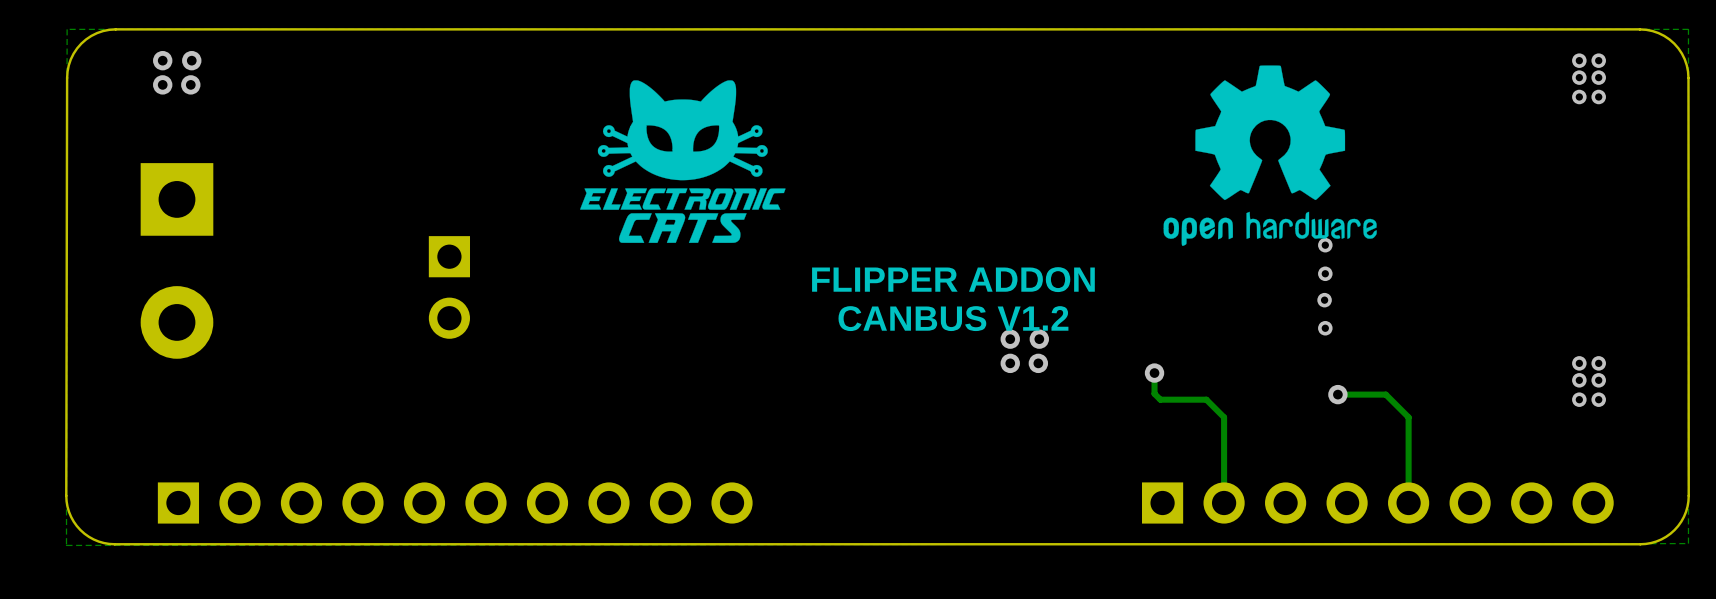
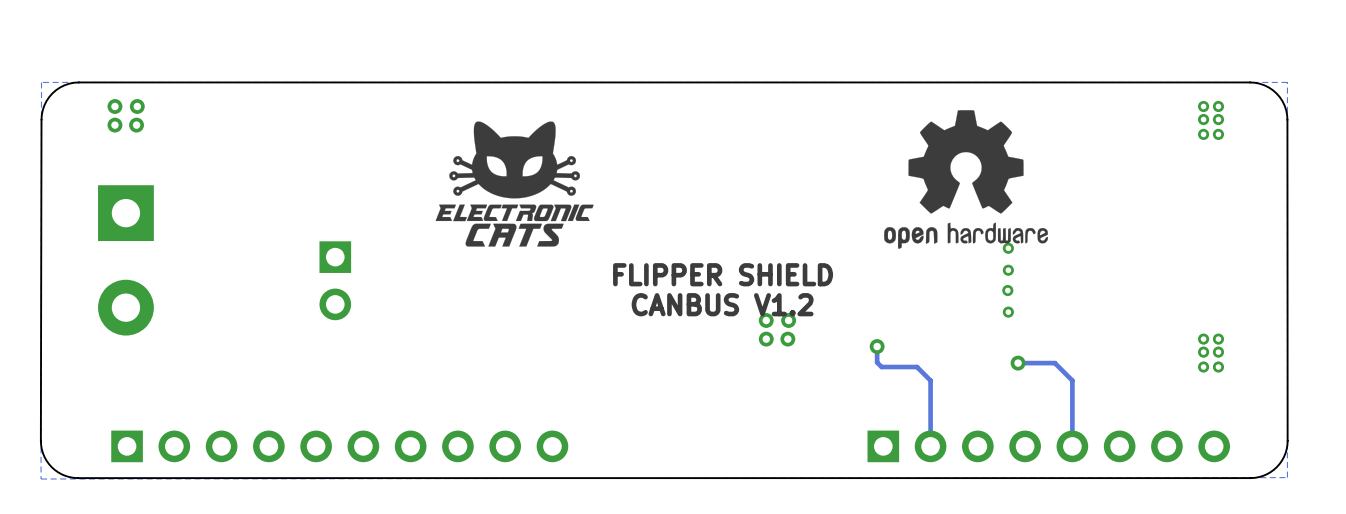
text: FLIPPER ADDON (953, 279) -> FLIPPER SHIELD (723, 274)

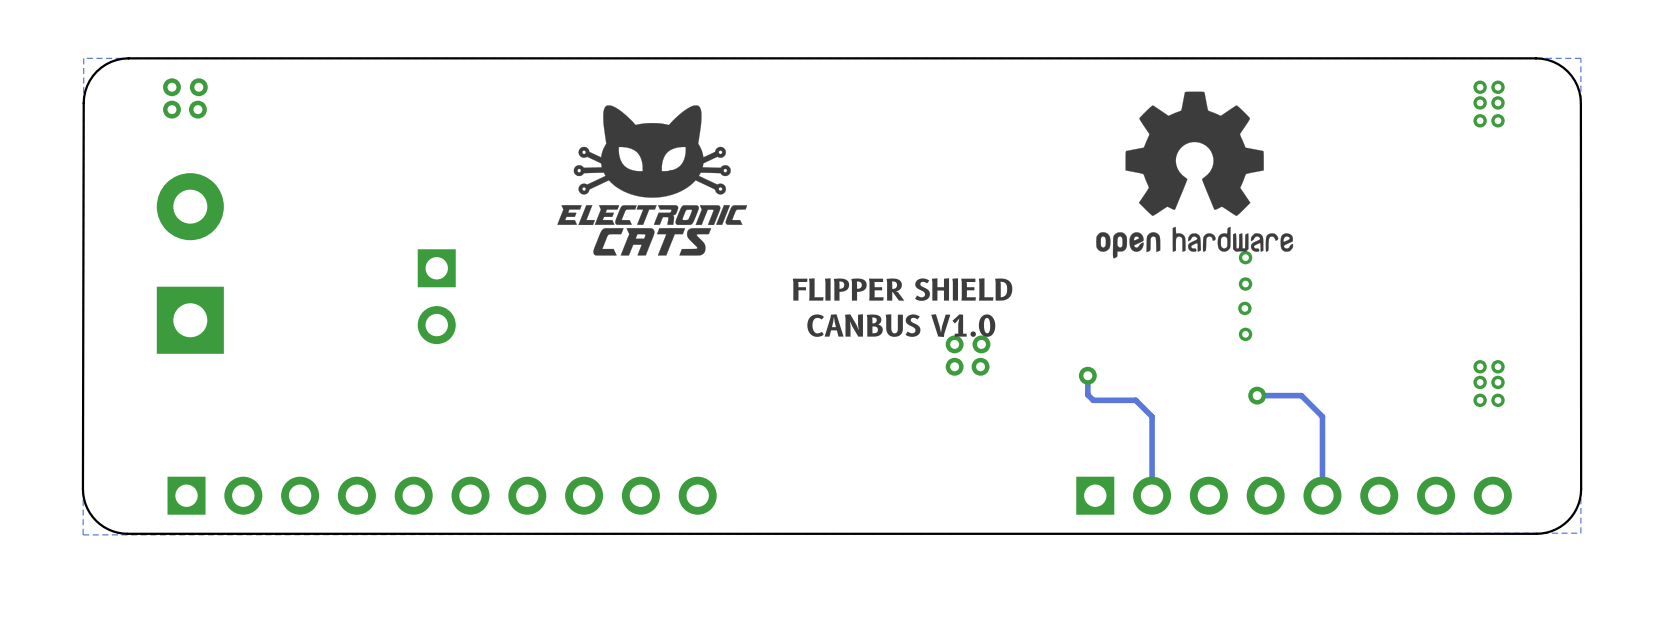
part rotation: 0° (125, 260) -> 180° (190, 263)
text: CANBUS V1.2 (722, 304) -> CANBUS V1.0 (901, 325)

